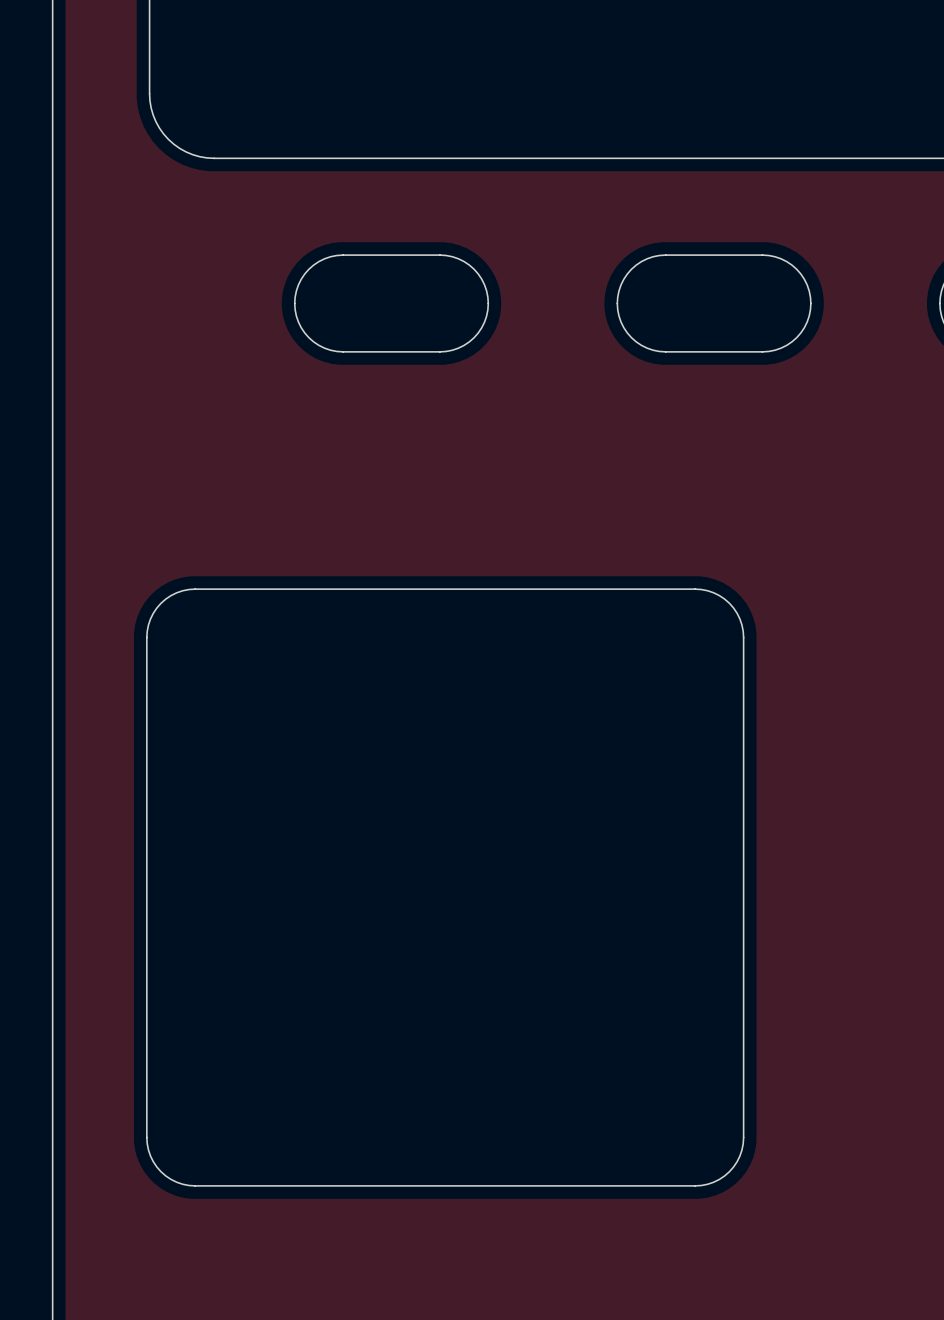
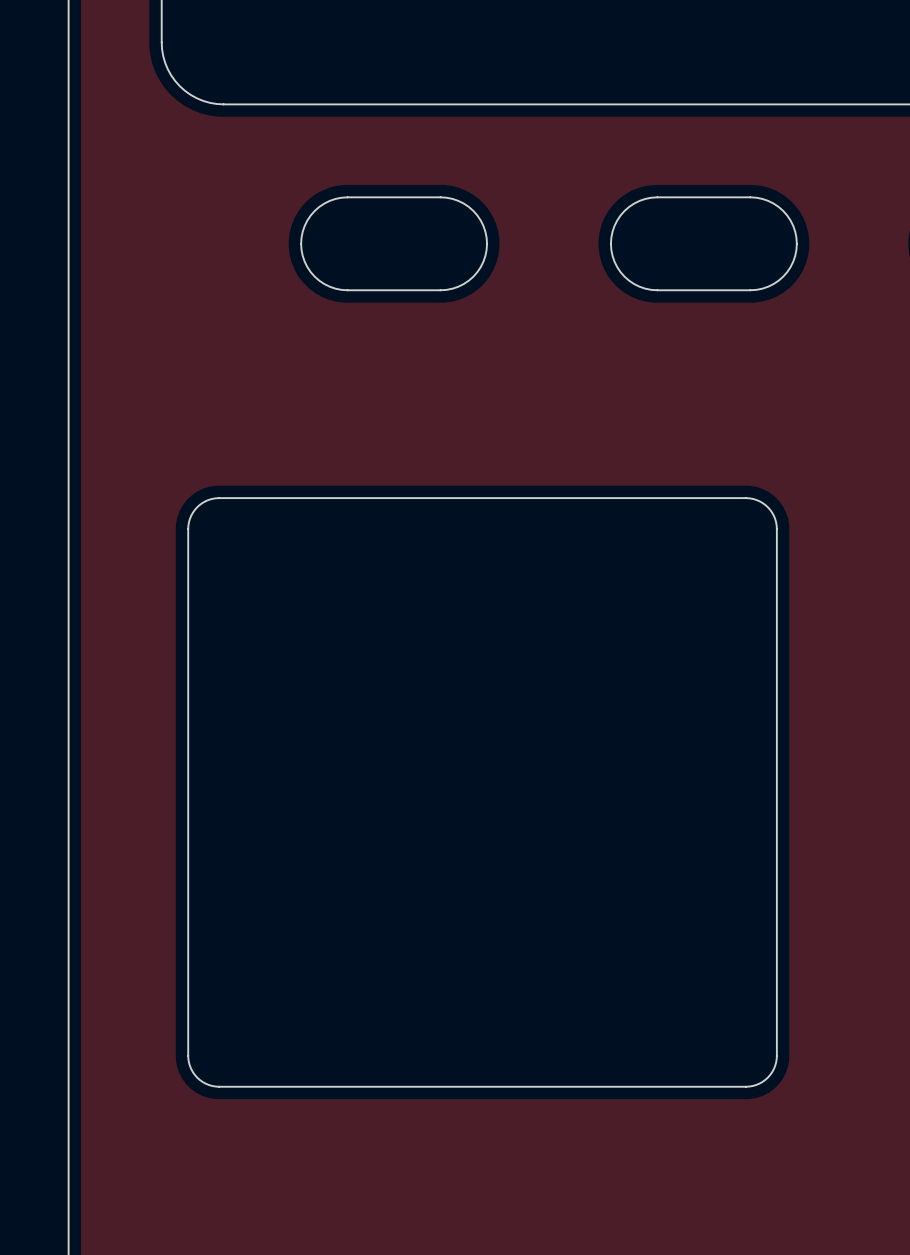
board edge: (195, 589) (695, 589) (713, 592) (729, 603) (739, 619) (743, 637) (743, 1137) (739, 1156) (729, 1171) (713, 1182) (695, 1185) (195, 1185) (176, 1182) (161, 1171) (150, 1156) (146, 1137) (146, 637) (150, 619) (161, 603) (176, 592) (195, 589) -> (219, 498) (208, 499) (197, 507) (191, 515) (188, 529) (188, 1055) (189, 1066) (197, 1077) (208, 1085) (219, 1086) (745, 1086) (756, 1085) (767, 1077) (773, 1069) (776, 1055) (776, 529) (775, 518) (767, 507) (759, 501) (745, 498) (219, 498)

